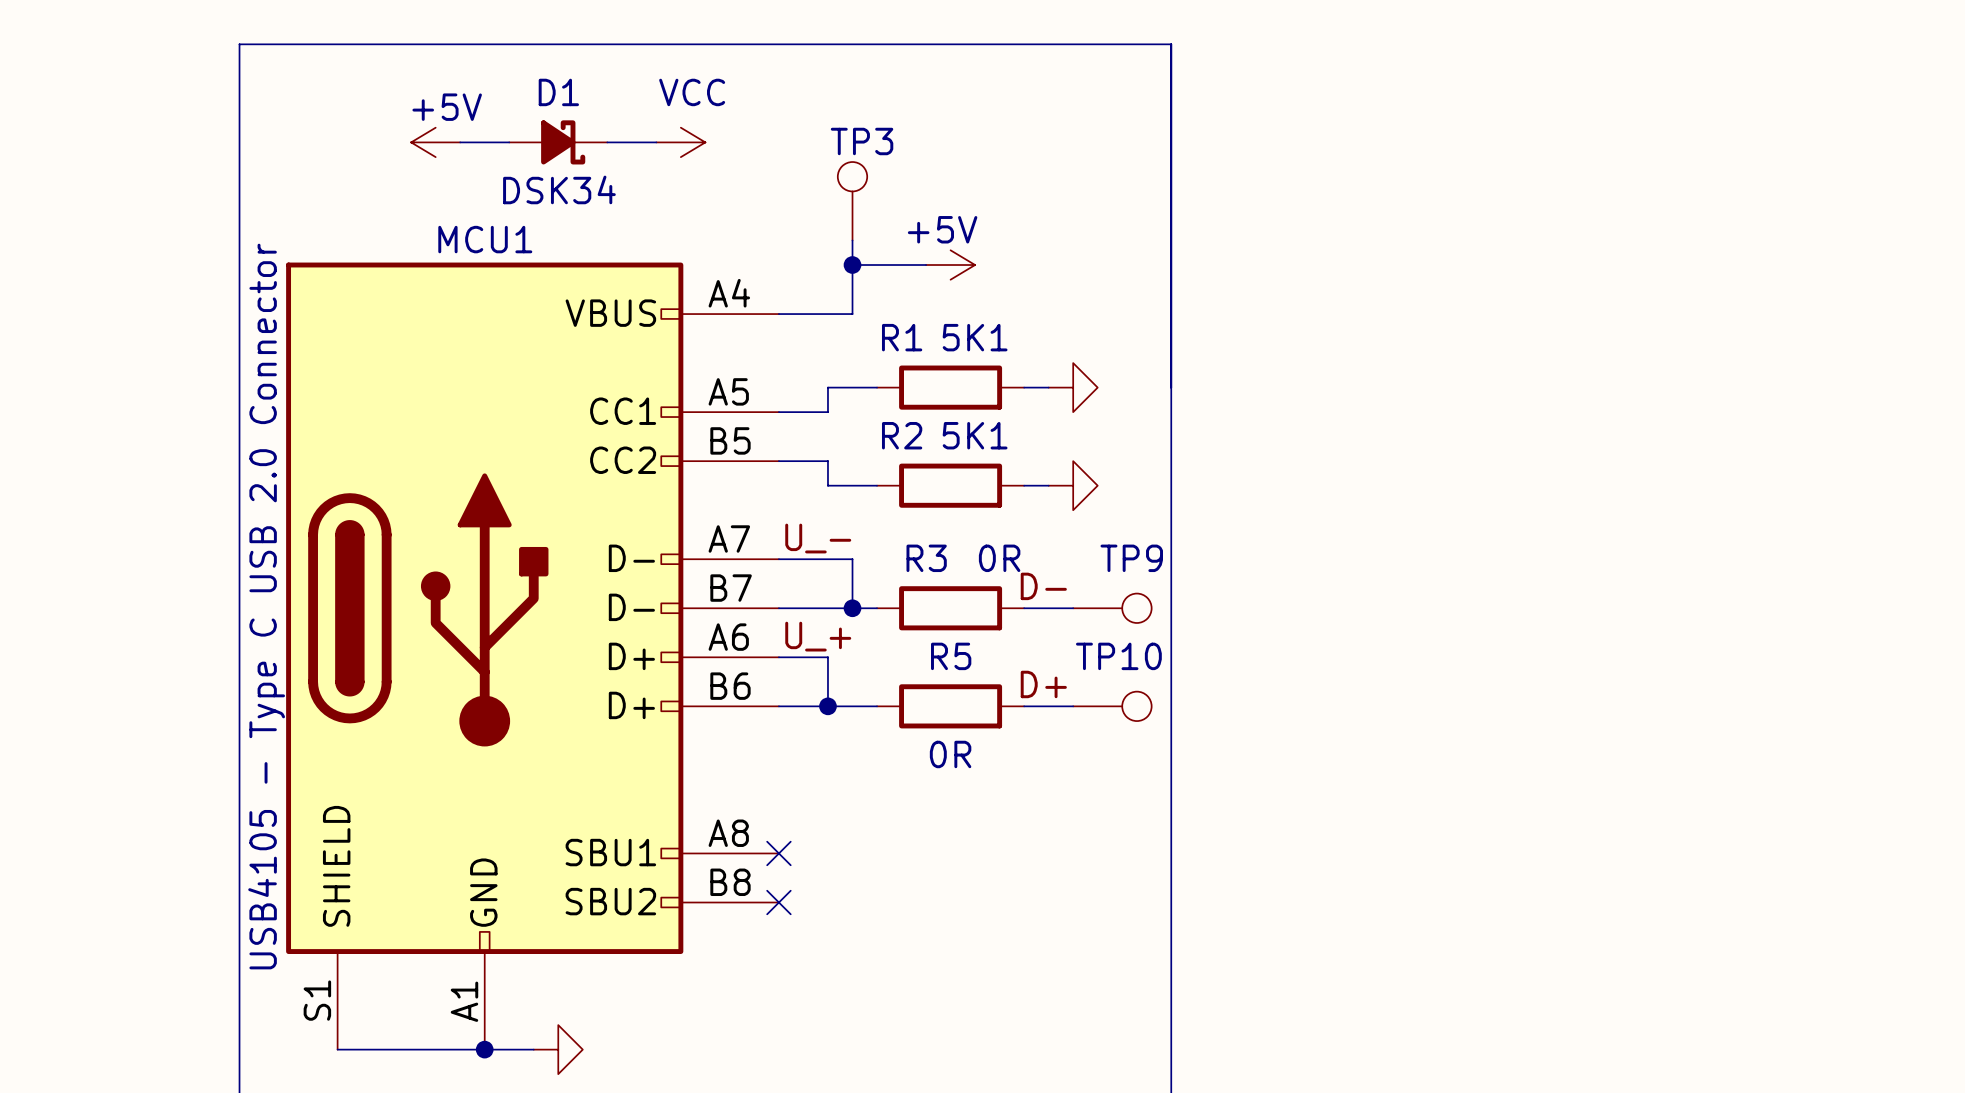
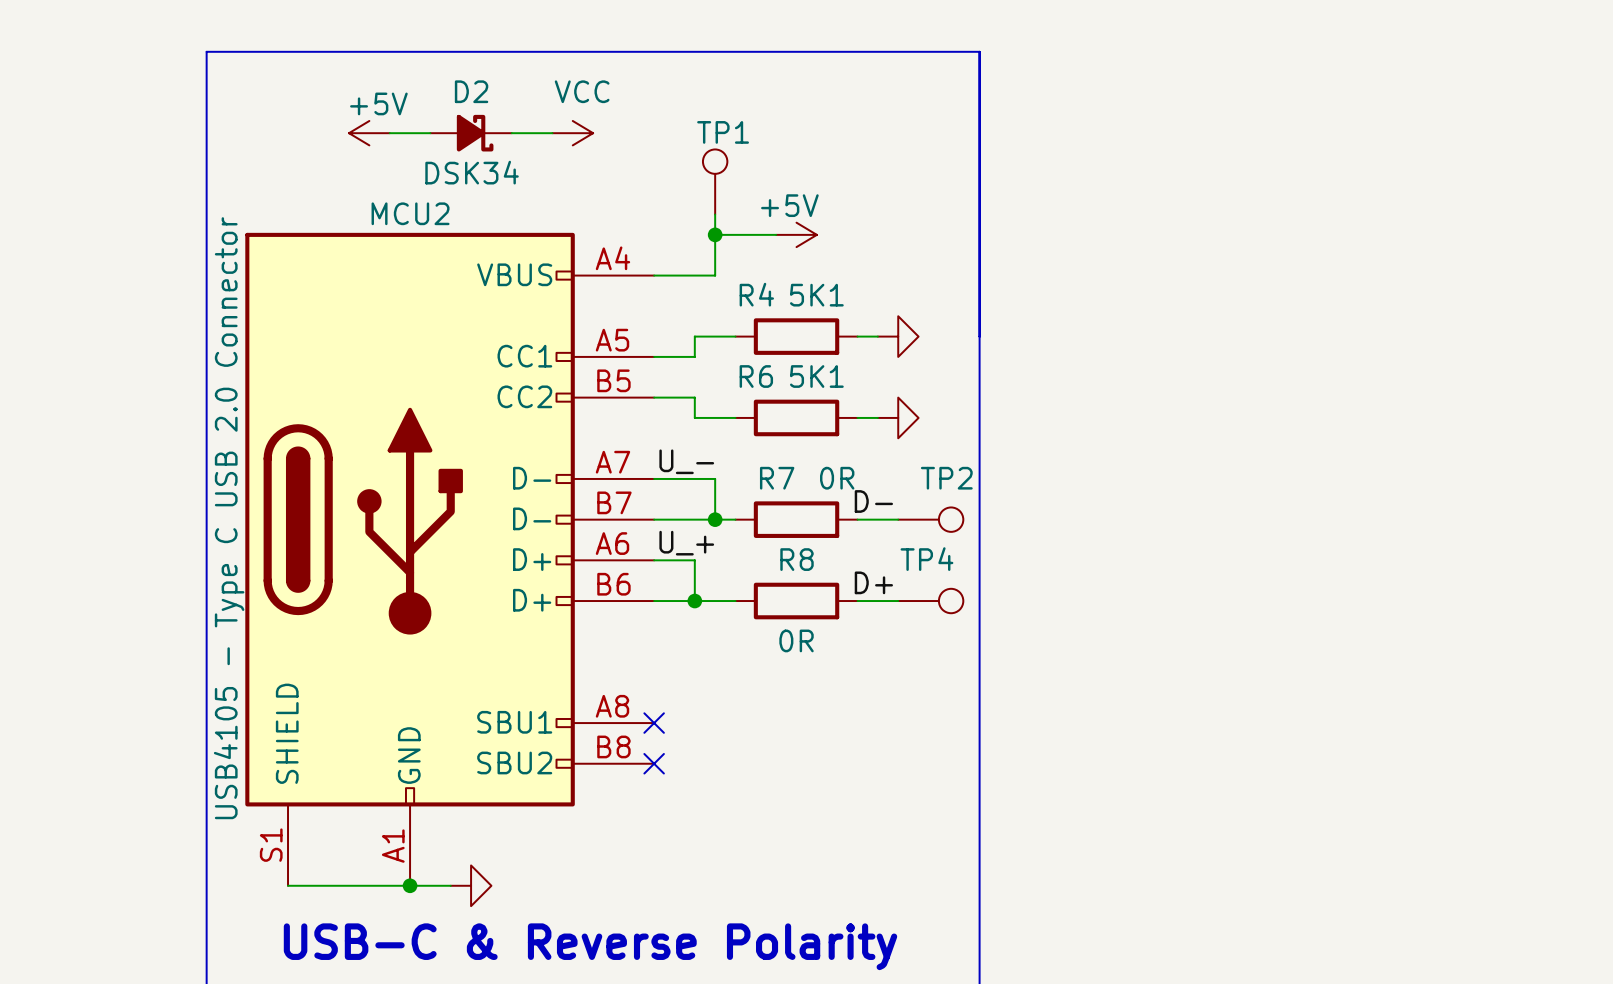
D1 name: D1 (558, 92) -> D2 (471, 91)
TP3 name: TP3 (862, 141) -> TP1 (723, 132)
MCU1 name: MCU1 (485, 239) -> MCU2 (410, 213)
R1 name: R1 (902, 337) -> R4 (756, 294)
R2 name: R2 (902, 435) -> R6 (756, 376)
R3 name: R3 (926, 558) -> R7 (777, 478)
TP9 name: TP9 (1131, 558) -> TP2 (946, 478)
R5 name: R5 (951, 656) -> R8 (797, 559)
TP10 name: TP10 (1118, 656) -> TP4 (926, 559)

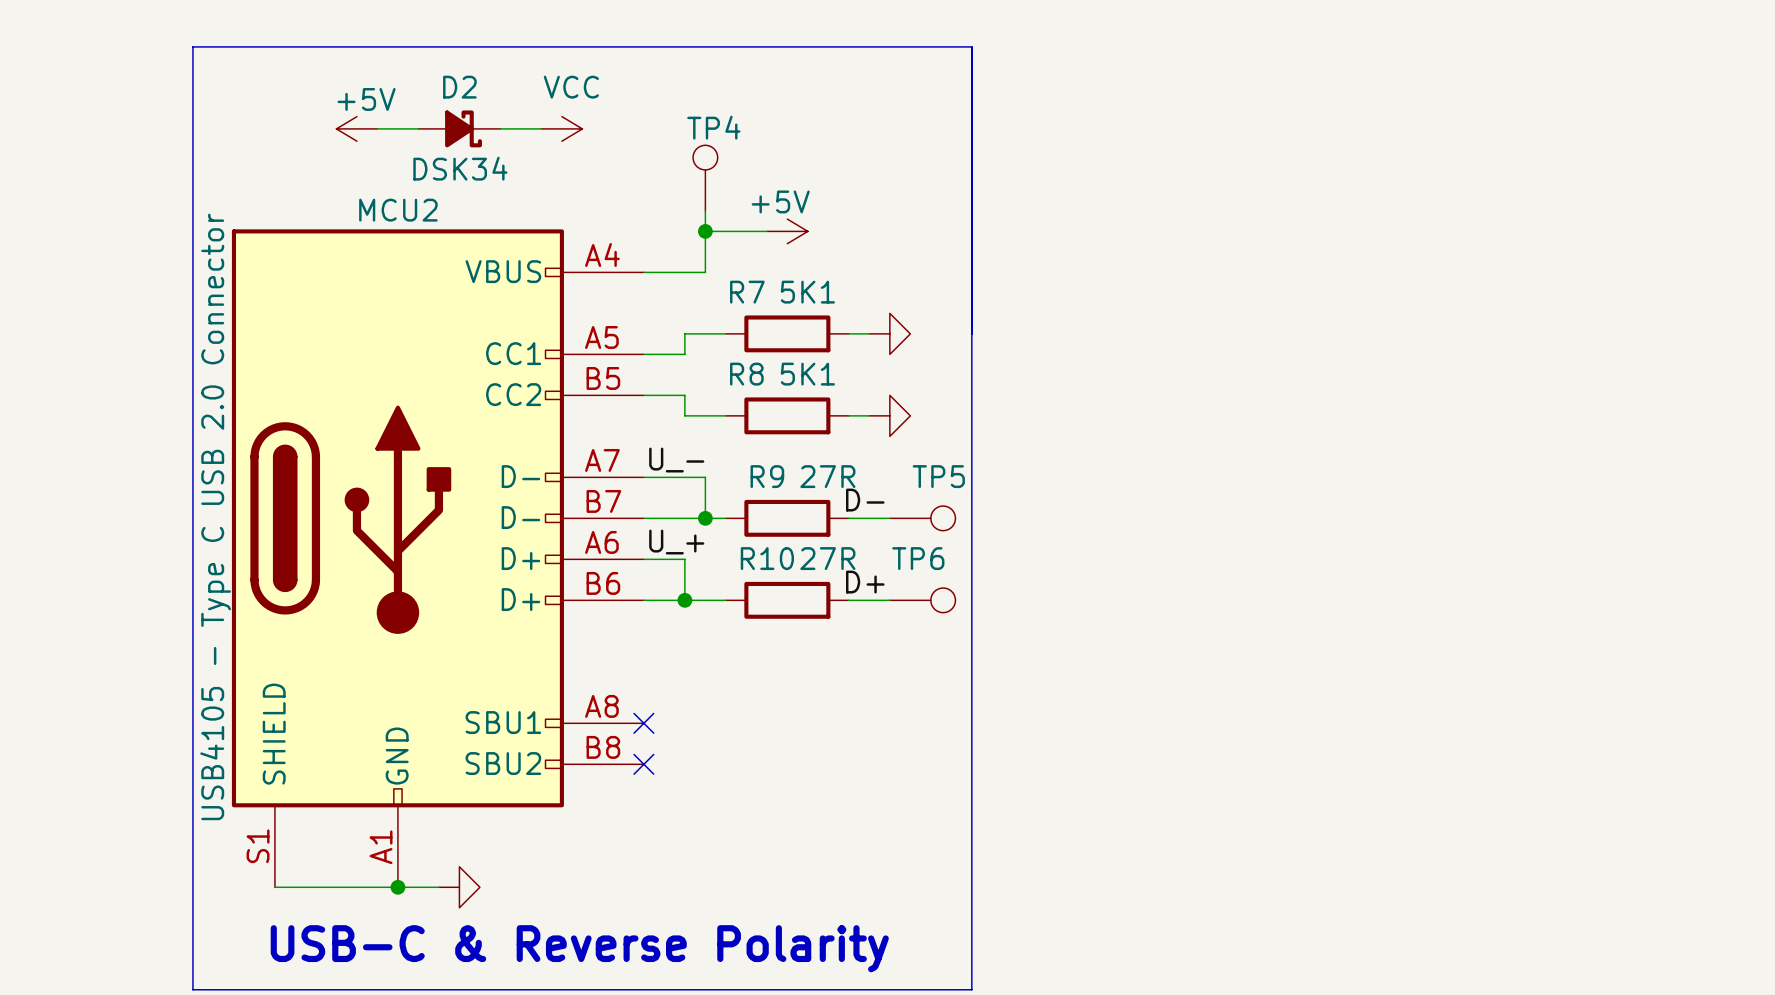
TP1 name: TP1 (723, 132) -> TP4 (713, 127)
R4 name: R4 (756, 294) -> R7 (747, 292)
R6 name: R6 (756, 376) -> R8 (746, 374)
R7 name: R7 (777, 478) -> R9 (767, 476)
R7 value: 0R (837, 478) -> 27R (827, 476)
TP2 name: TP2 (946, 478) -> TP5 (938, 476)
R8 name: R8 (797, 559) -> R10 (767, 558)
TP4 name: TP4 (926, 559) -> TP6 (918, 558)
R8 value: 0R (796, 640) -> 27R (827, 558)

